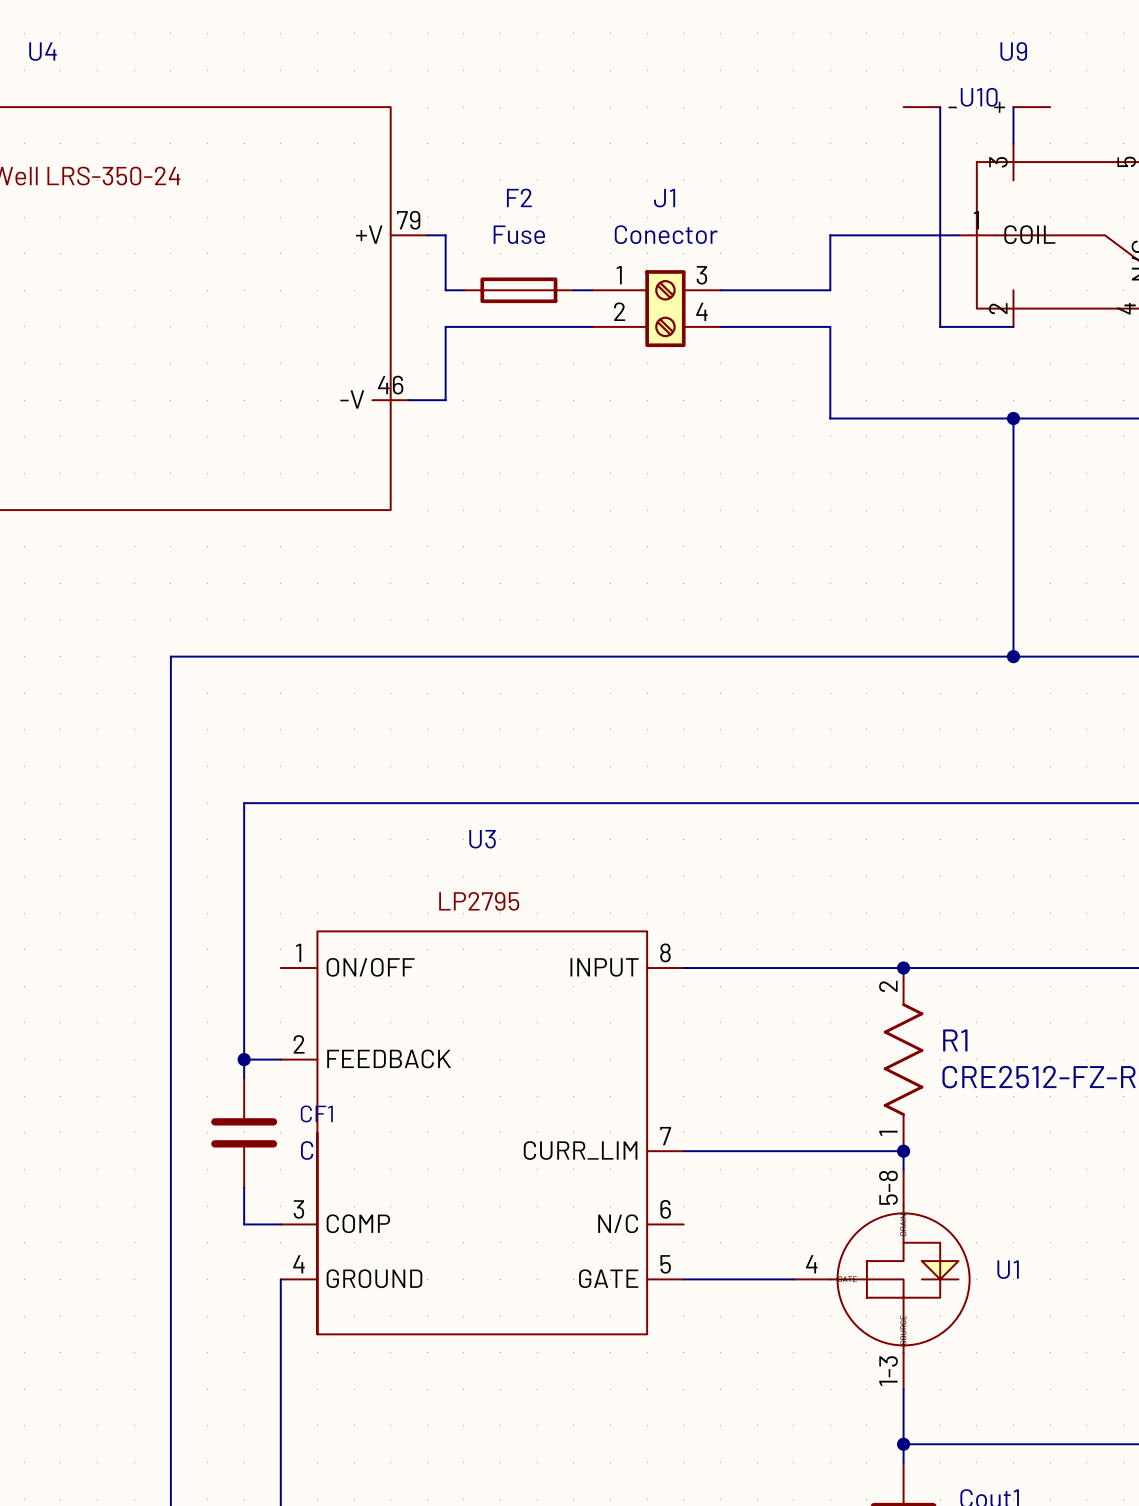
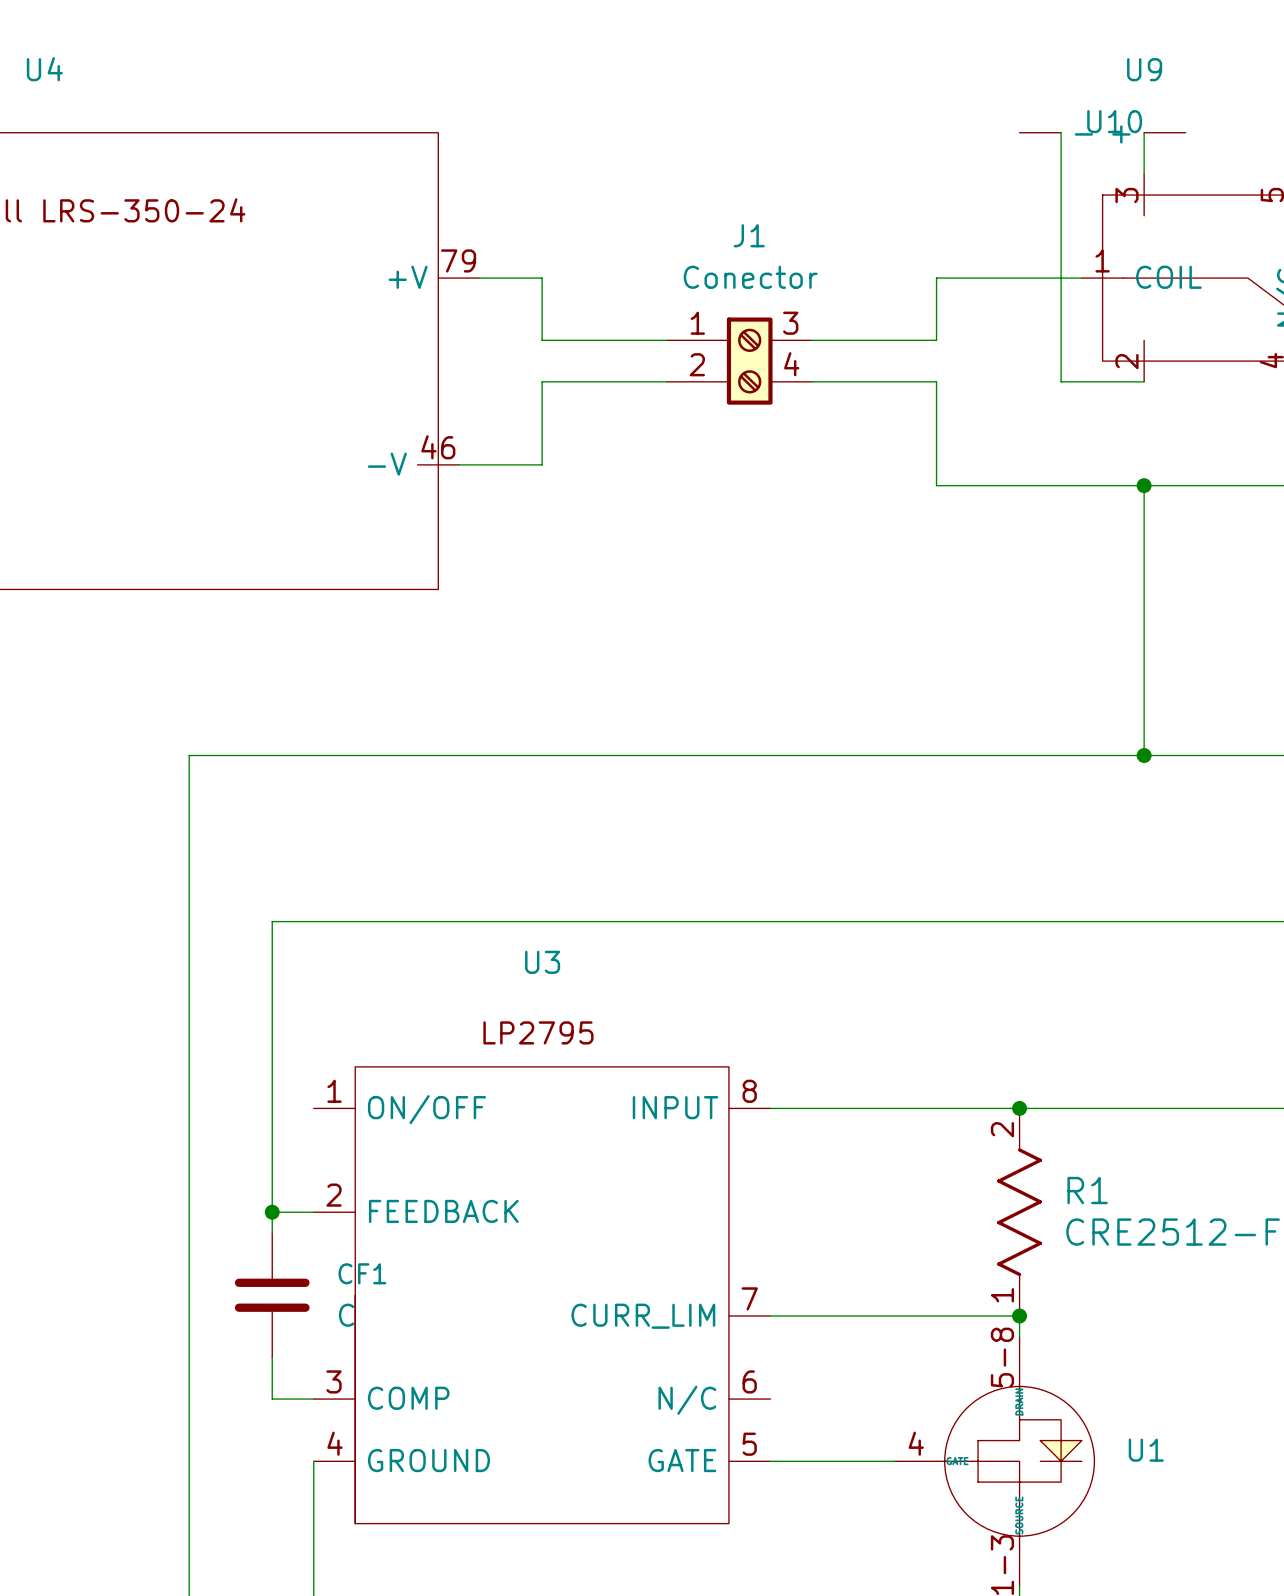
wire: (445, 235) (445, 290) (463, 290) -> (500, 278) (542, 278) (542, 340) (645, 340)
F2: Fuse (518, 290) -> none
wire: (482, 326) (445, 326) (445, 400) -> (542, 381) (542, 464) (500, 464)

